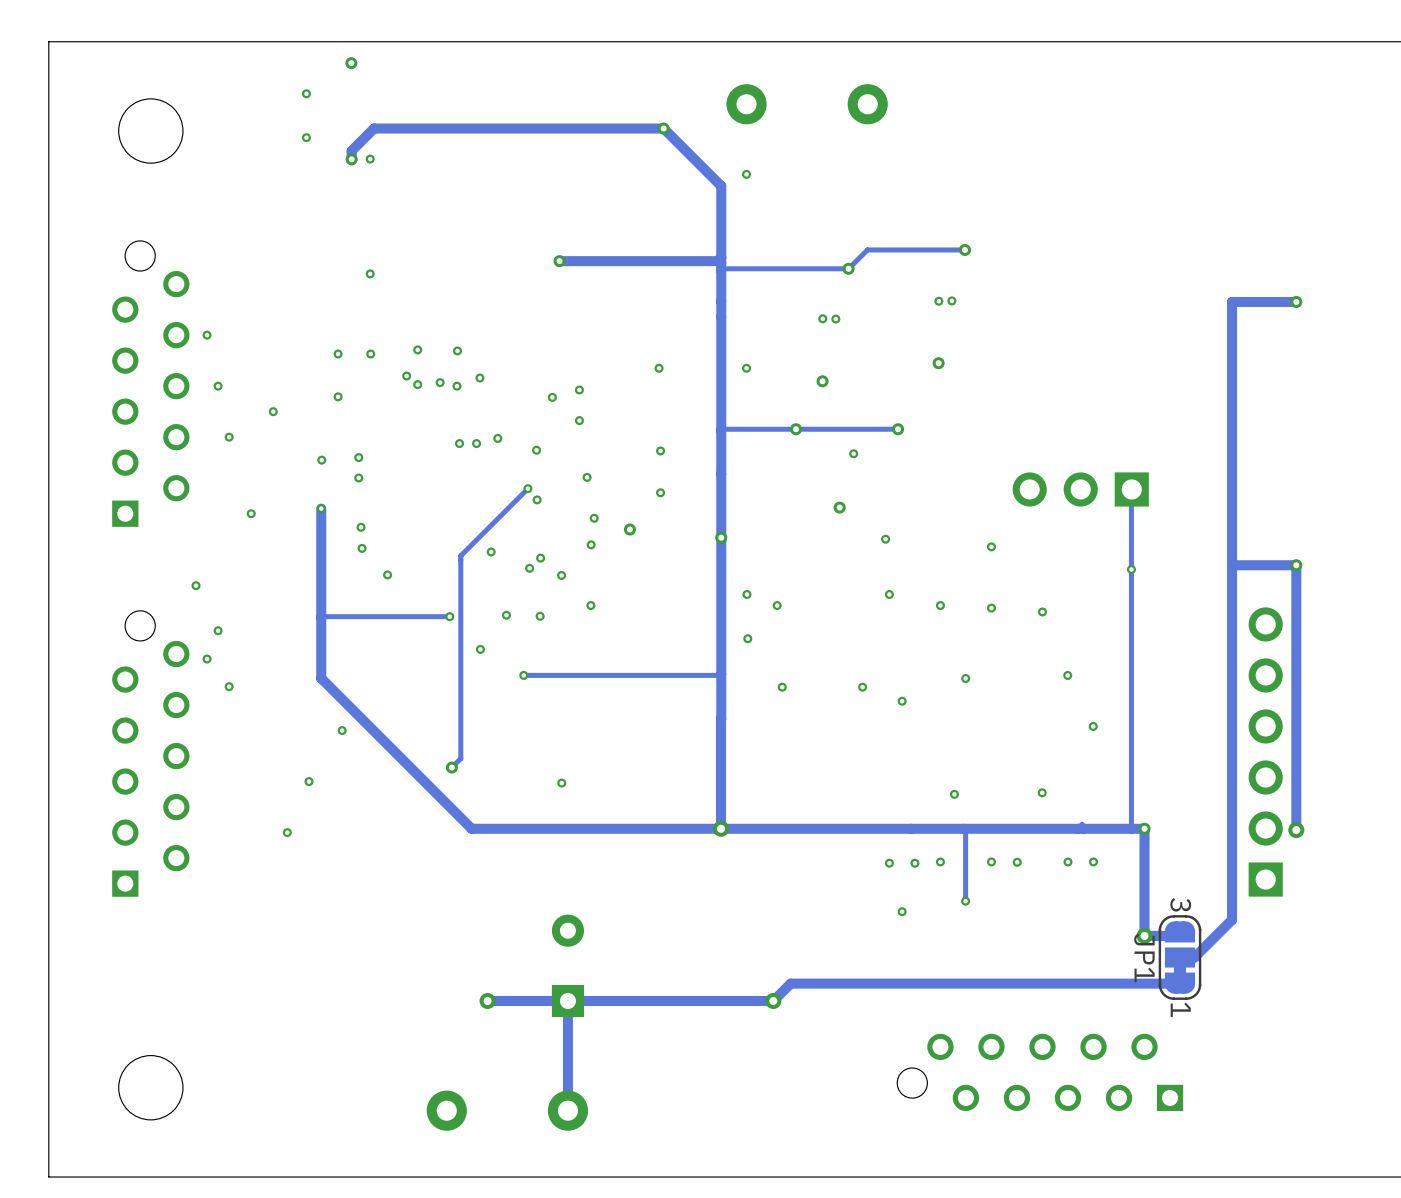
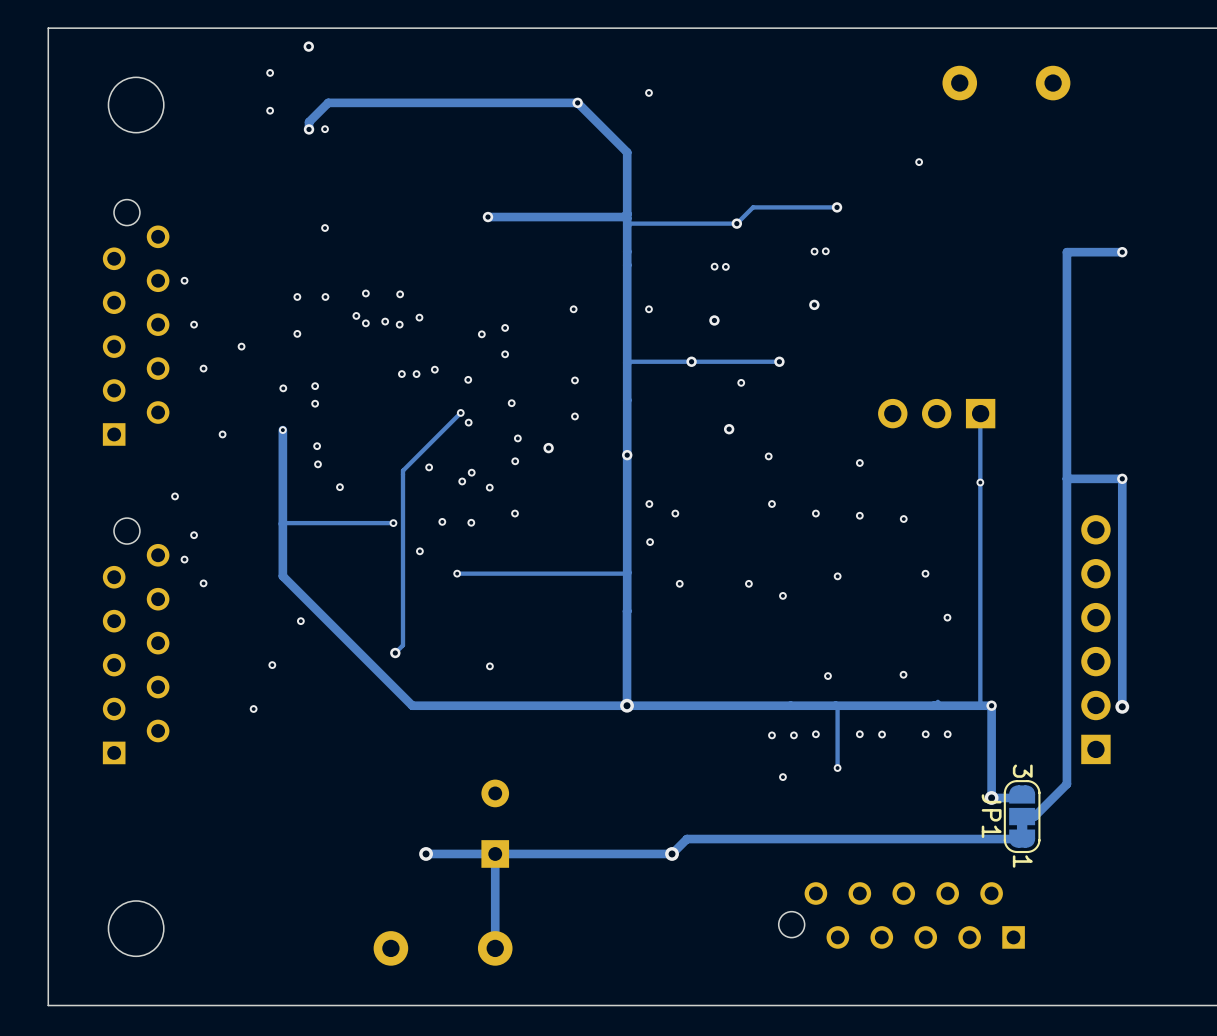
part: (746, 104) -> none
part: (867, 104) -> none
part: none -> (959, 83)
part: none -> (1053, 83)
via position: (746, 174) -> (648, 92)
via: none -> (919, 162)

